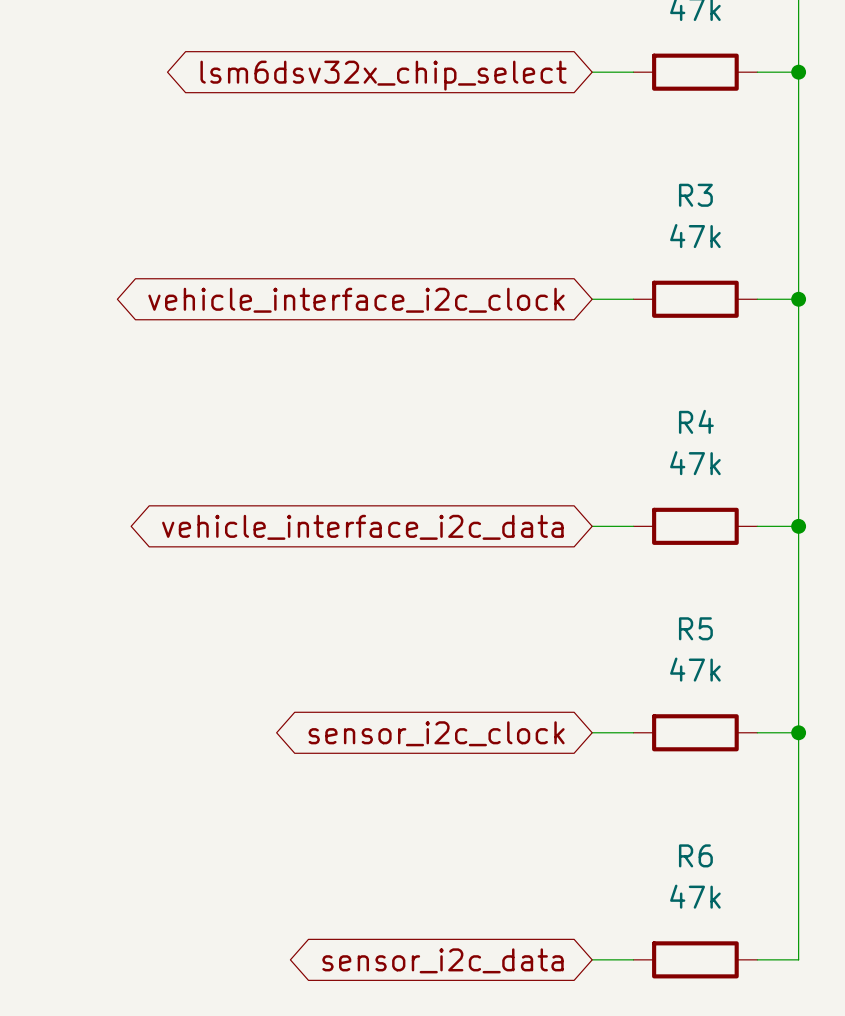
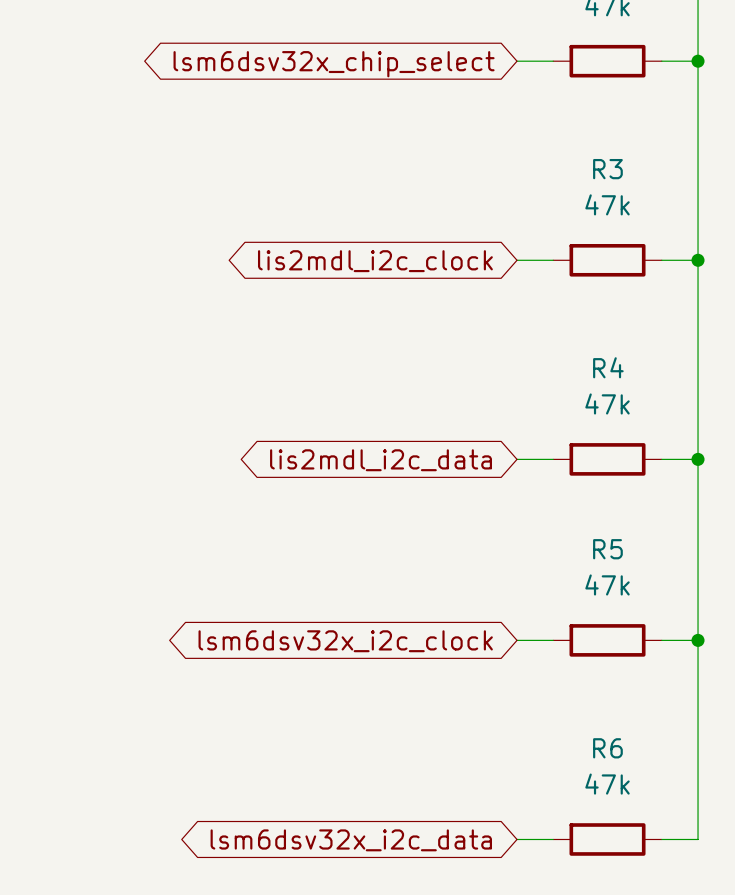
global label: vehicle_interface_i2c_clock (356, 300) -> lis2mdl_i2c_clock (375, 261)
global label: vehicle_interface_i2c_data (362, 527) -> lis2mdl_i2c_data (381, 460)
global label: sensor_i2c_clock (436, 733) -> lsm6dsv32x_i2c_clock (345, 641)
global label: sensor_i2c_data (442, 960) -> lsm6dsv32x_i2c_data (351, 840)

